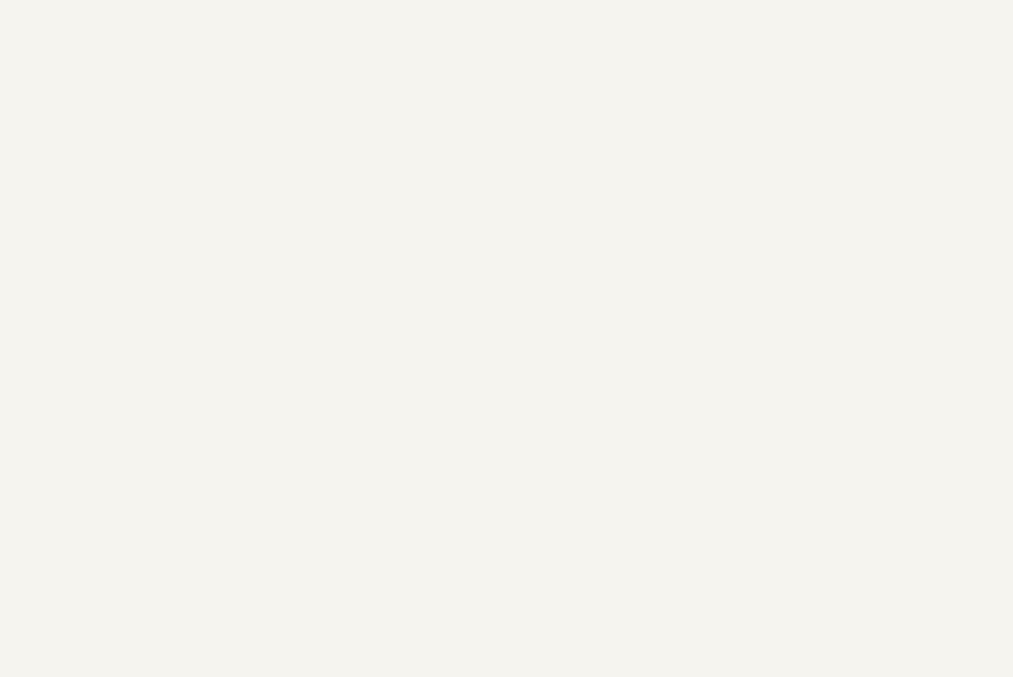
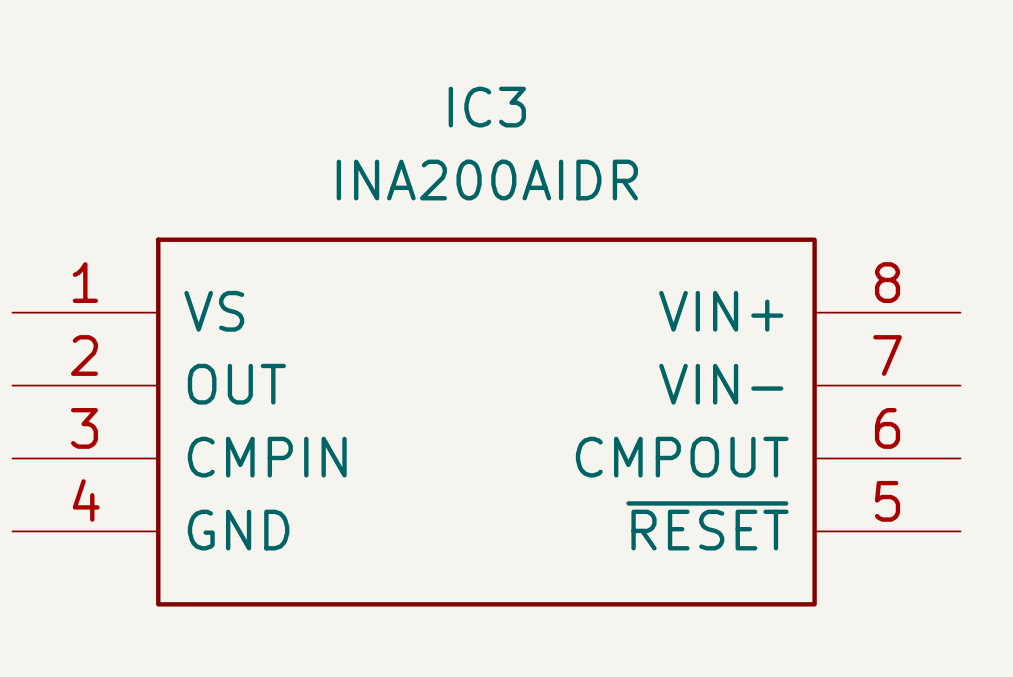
IC3: none -> INA200AIDR (486, 422)

